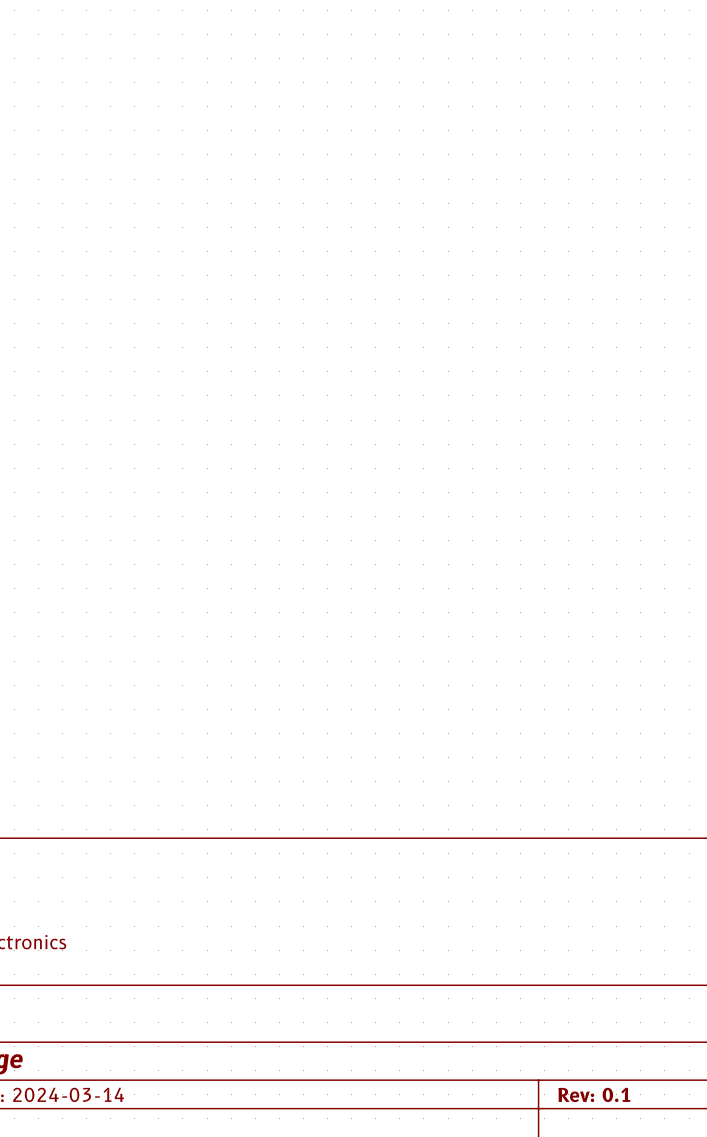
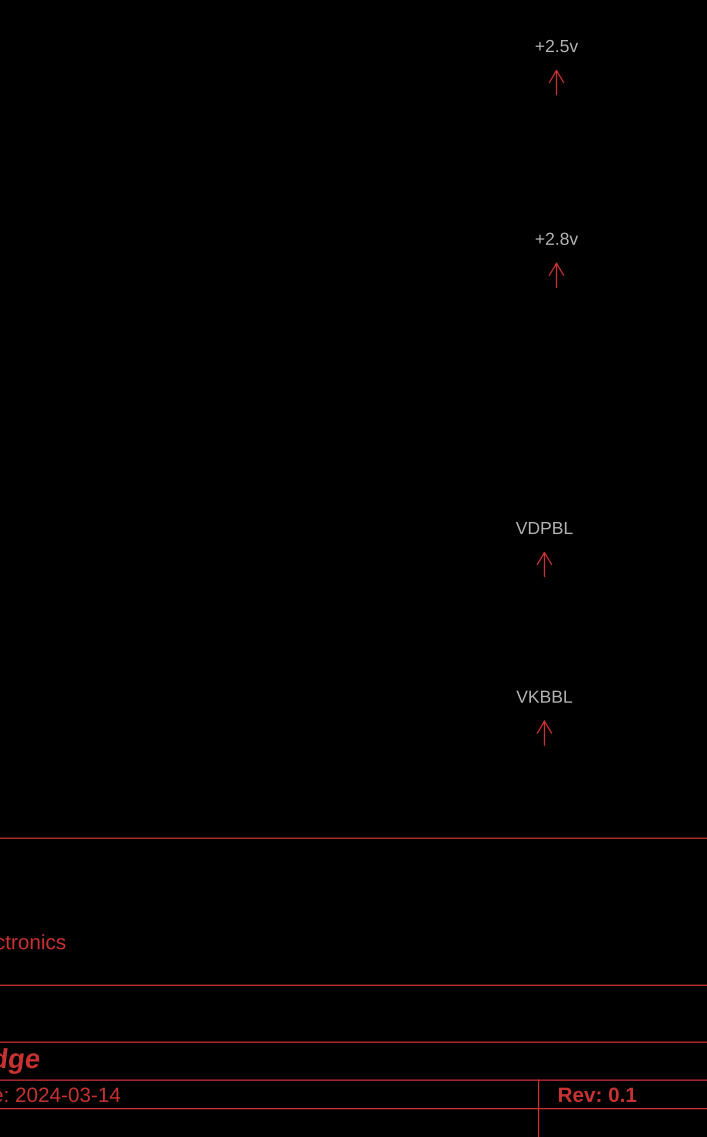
power symbol: none -> +2.5v (556, 82)
power symbol: none -> +2.8v (556, 275)
power symbol: none -> VDPBL (544, 564)
power symbol: none -> VKBBL (544, 733)

